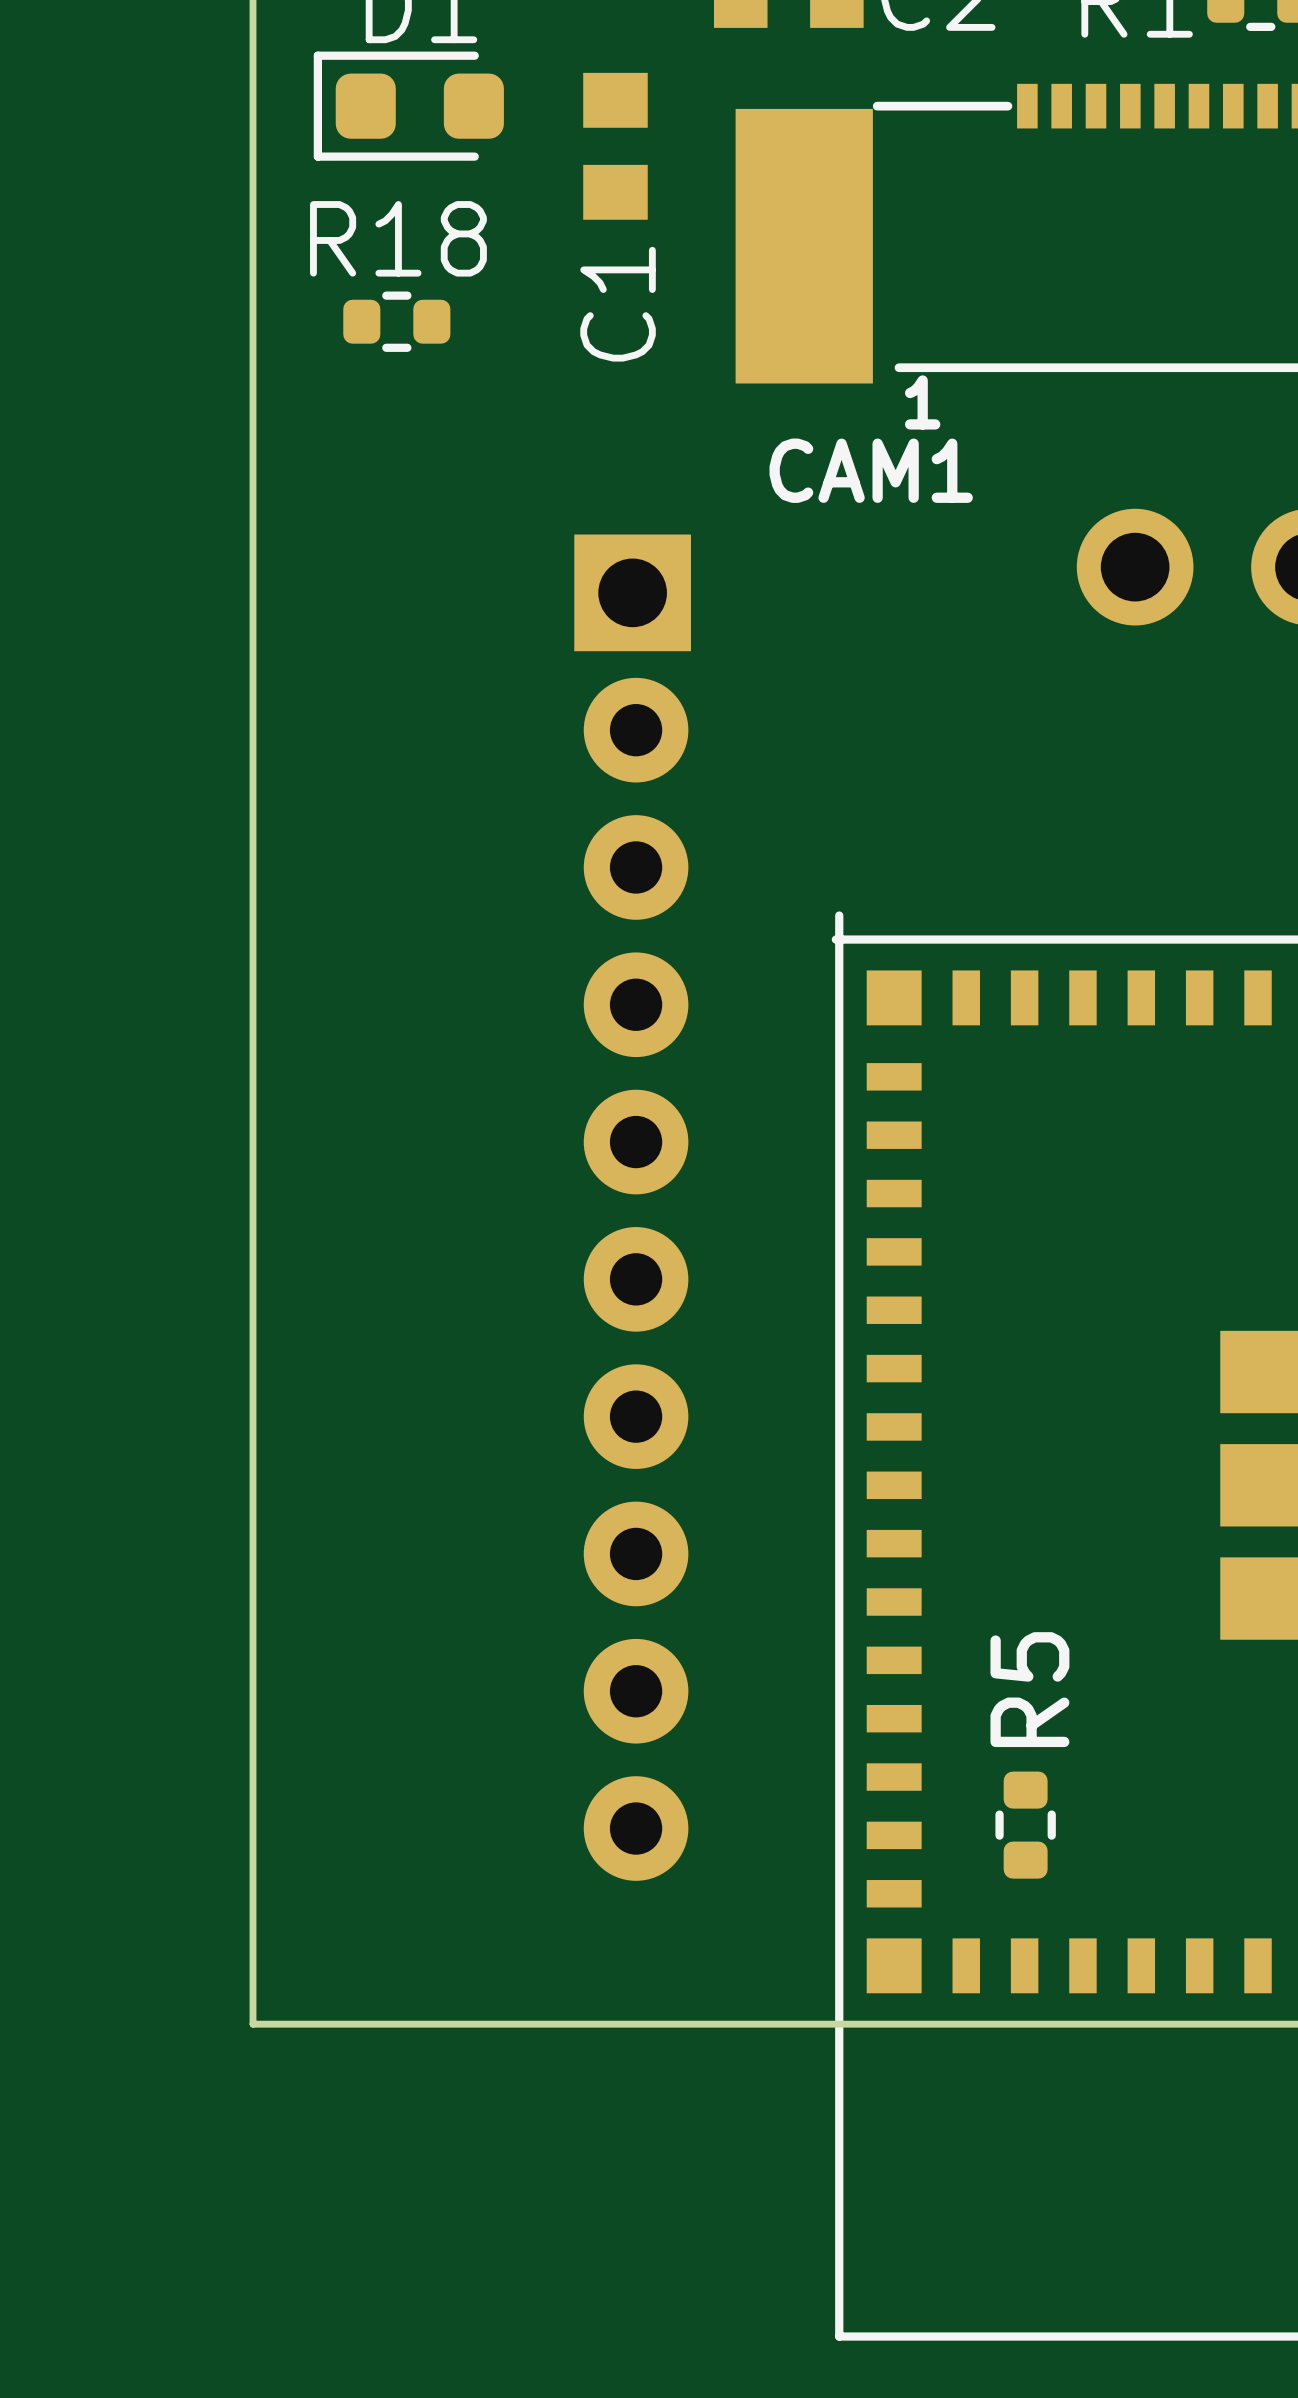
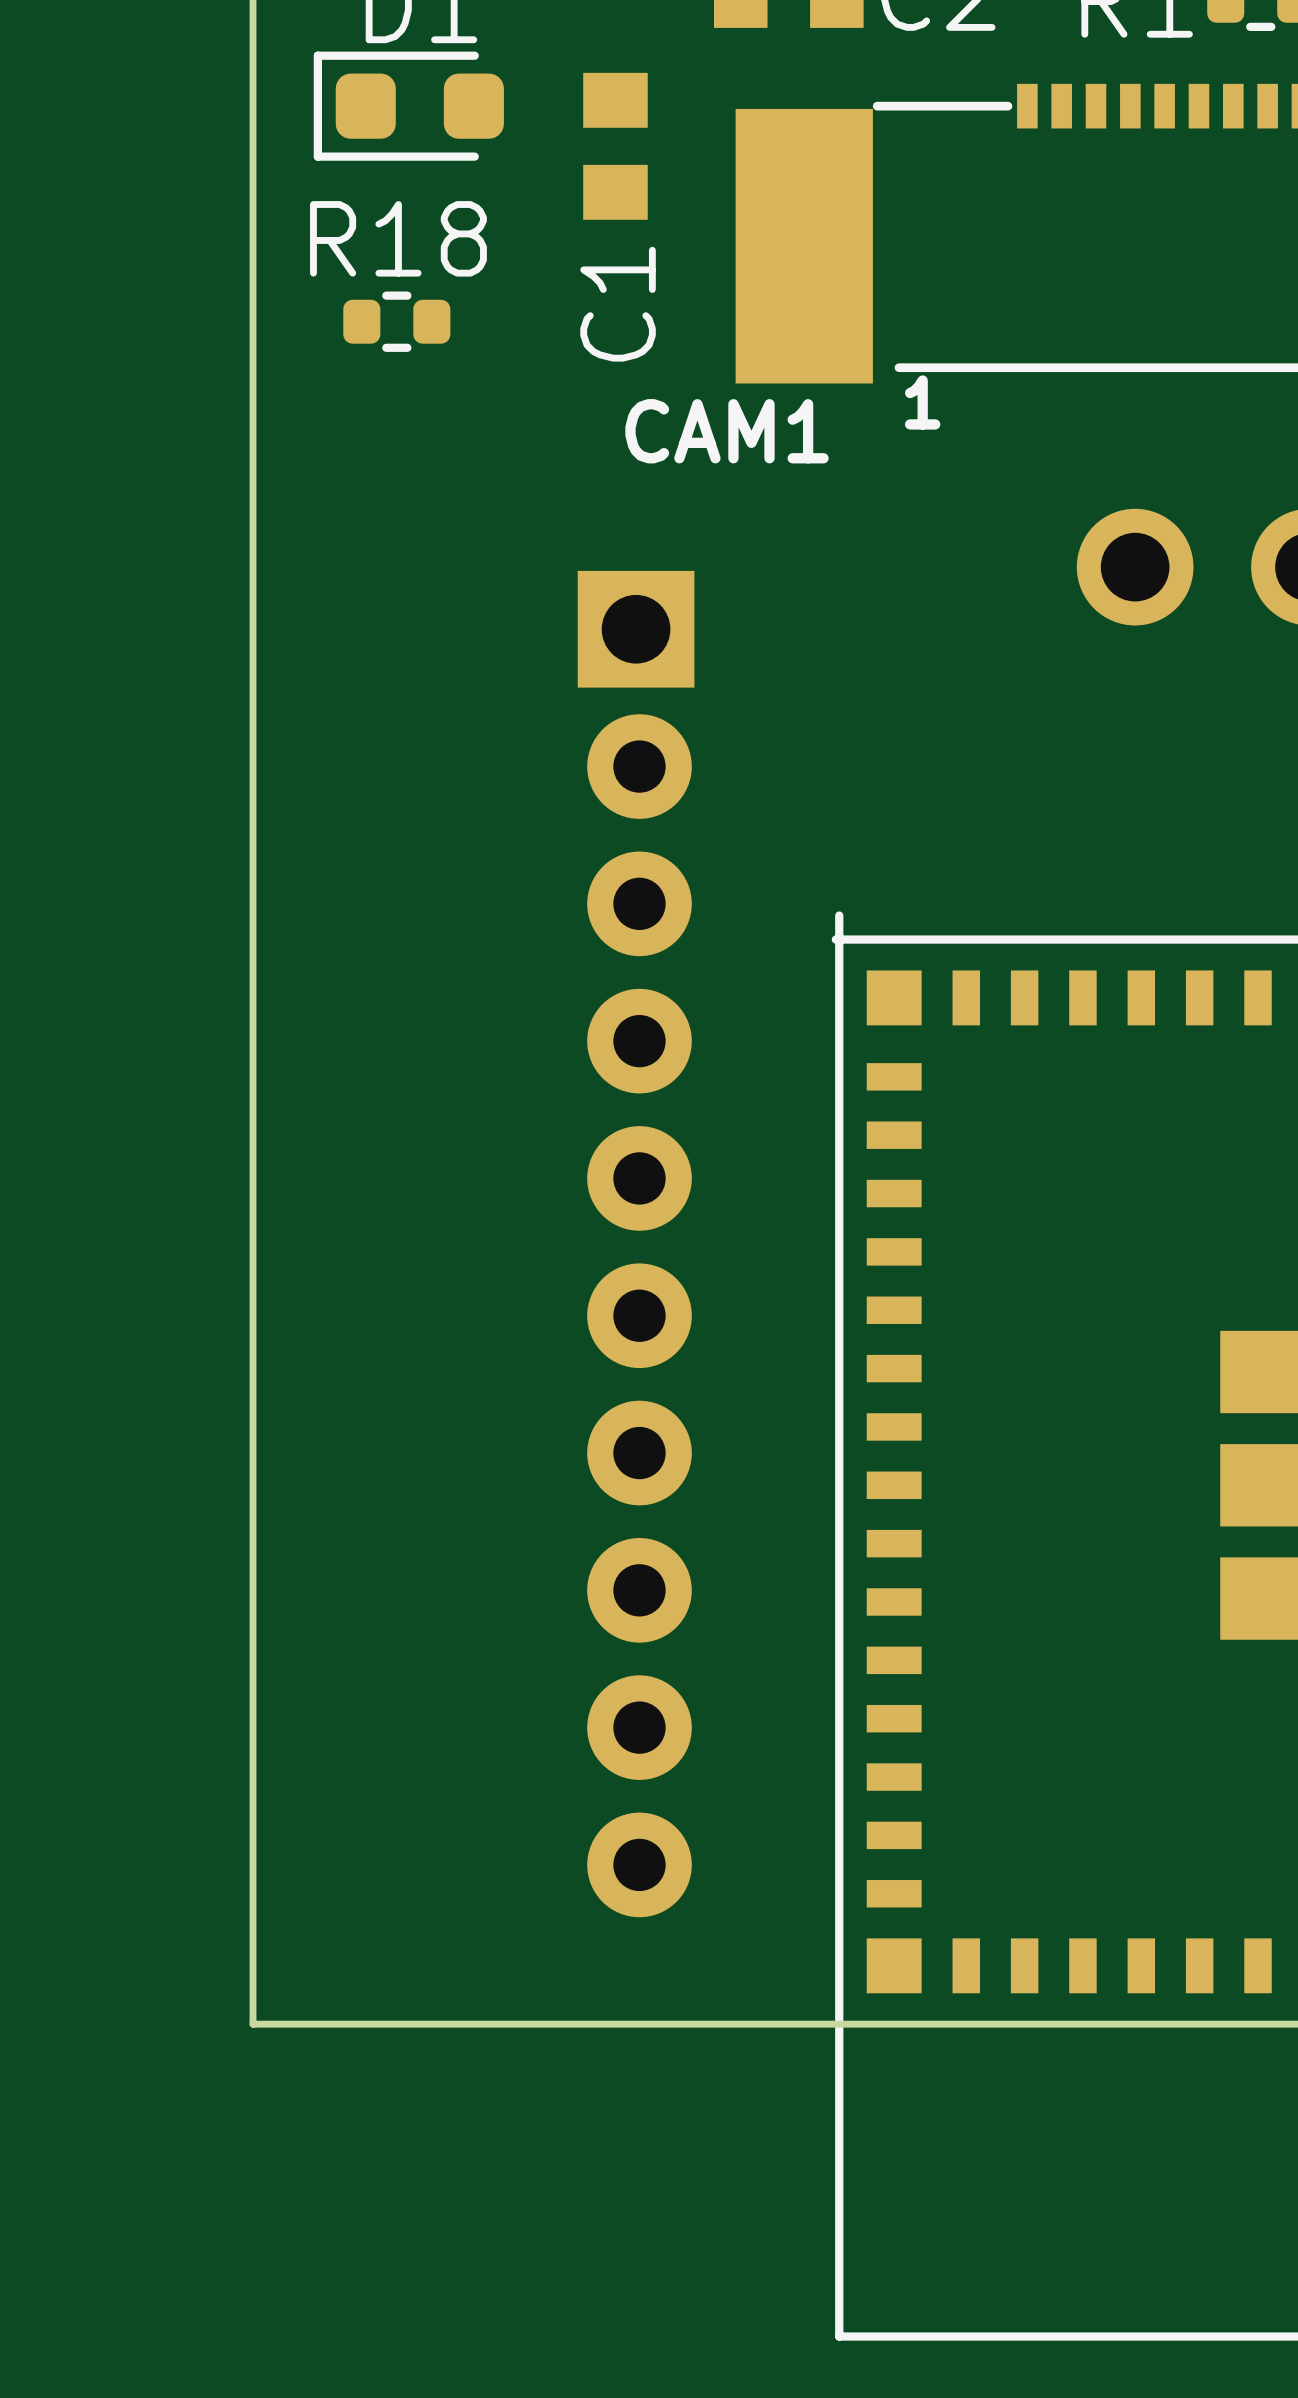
CAM1 name position: CAM1 (871, 470) -> CAM1 (727, 431)
part position: (632, 1207) -> (636, 1244)
R5: (1025, 1825) -> none

